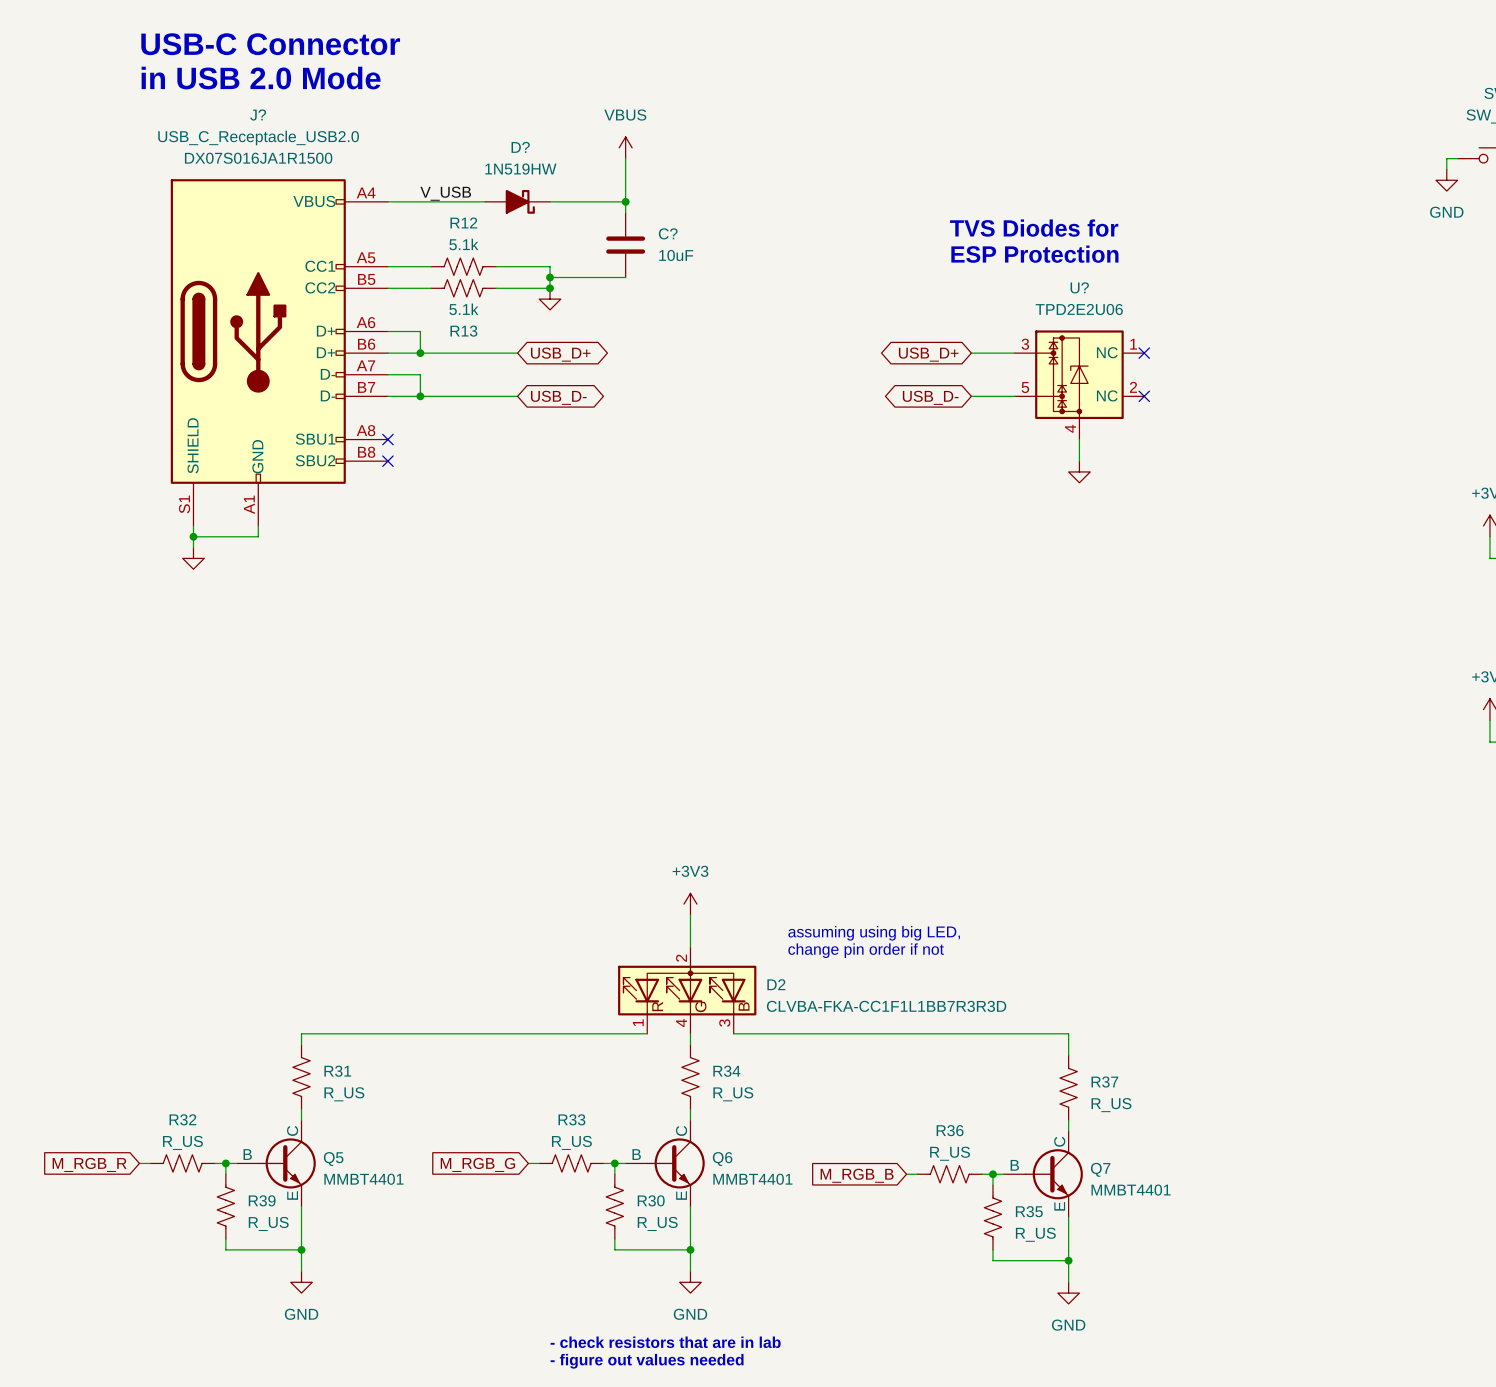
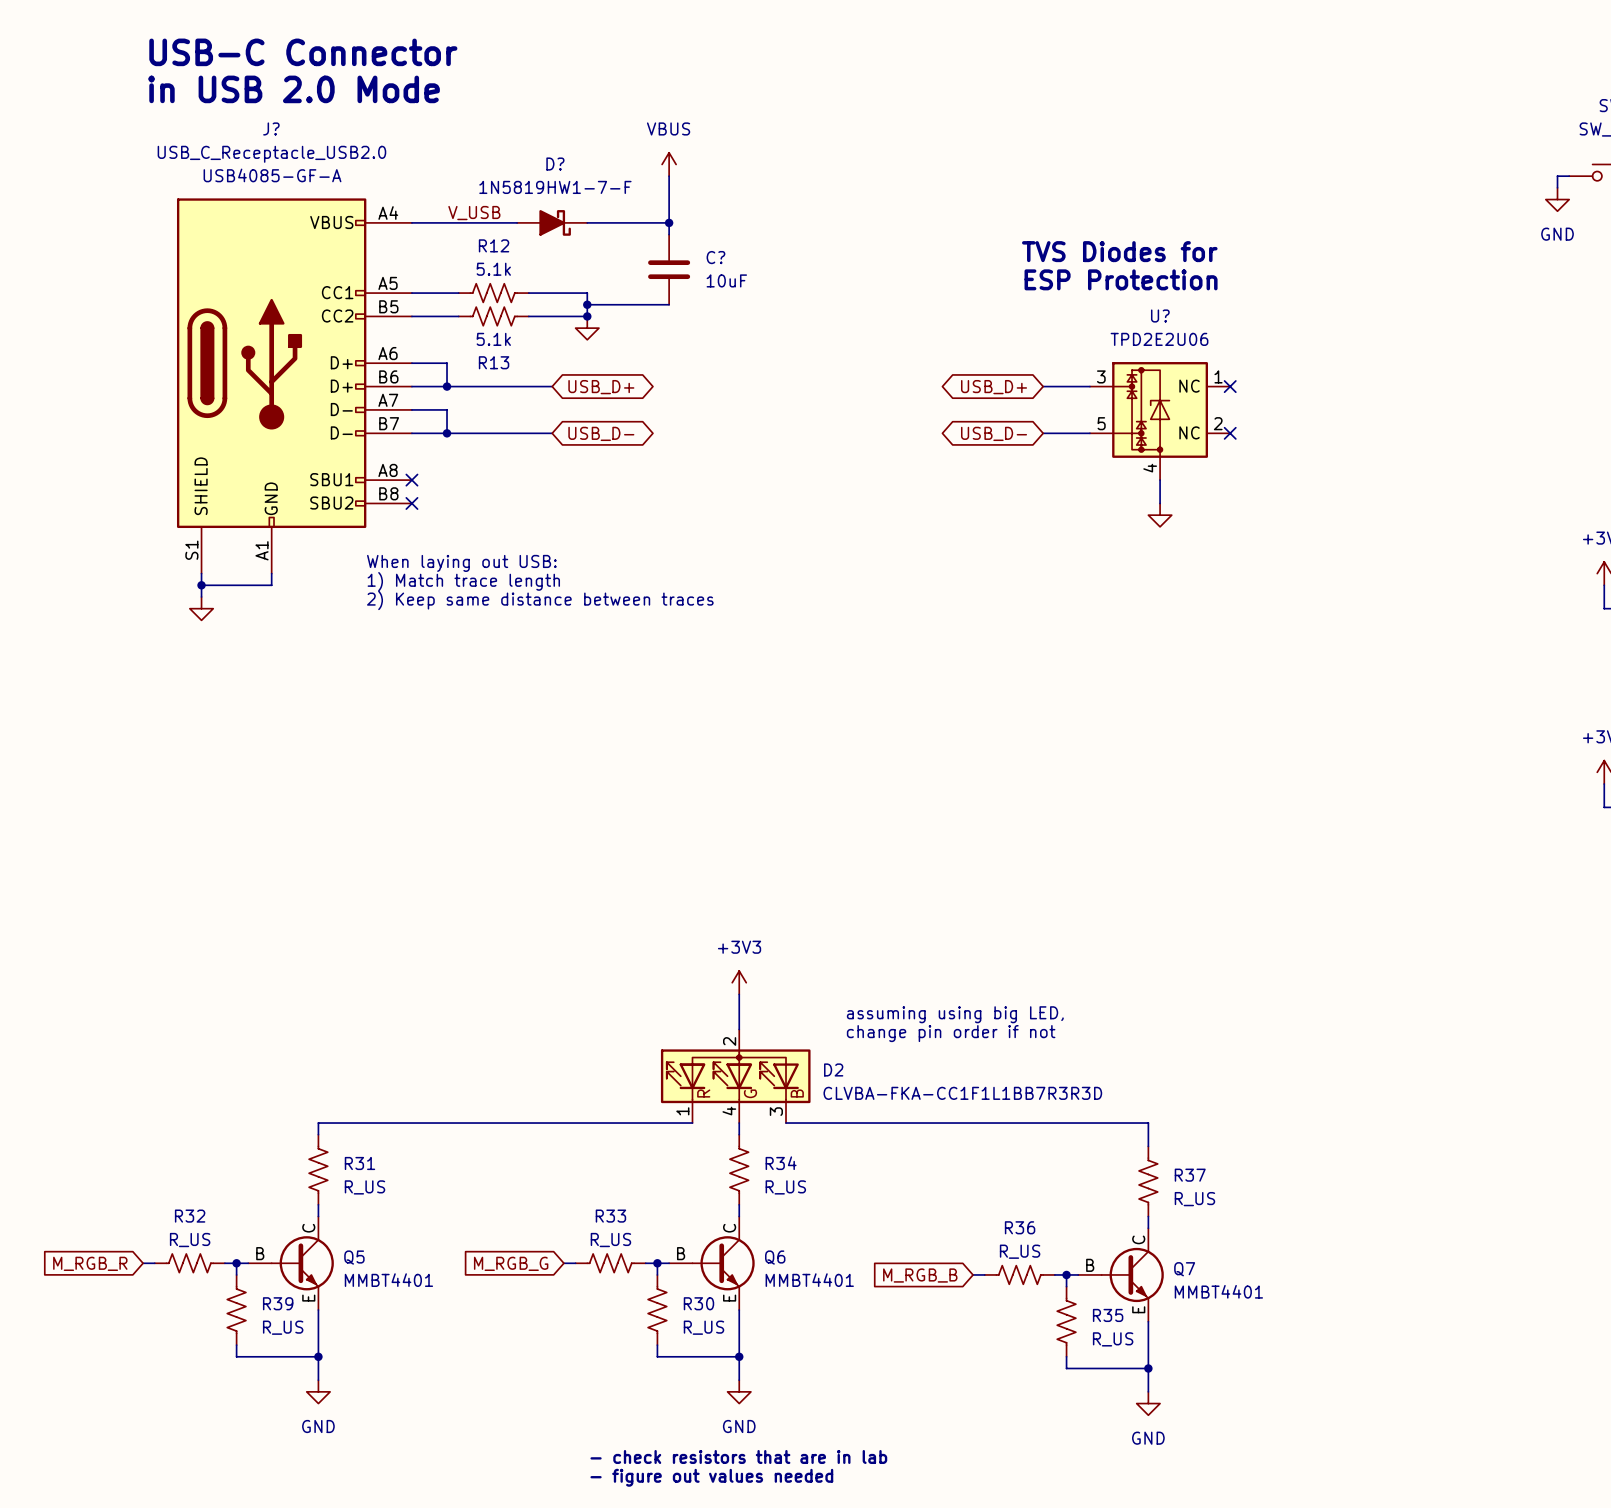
J? text: DX07S016JA1R1500 (258, 158) -> USB4085-GF-A (272, 175)
D? value: 1N519HW (520, 169) -> 1N5819HW1-7-F (555, 187)
text: none -> When laying out USB: (461, 563)
text: none -> 1) Match trace length (463, 581)
text: none -> 2) Keep same distance between traces (540, 600)

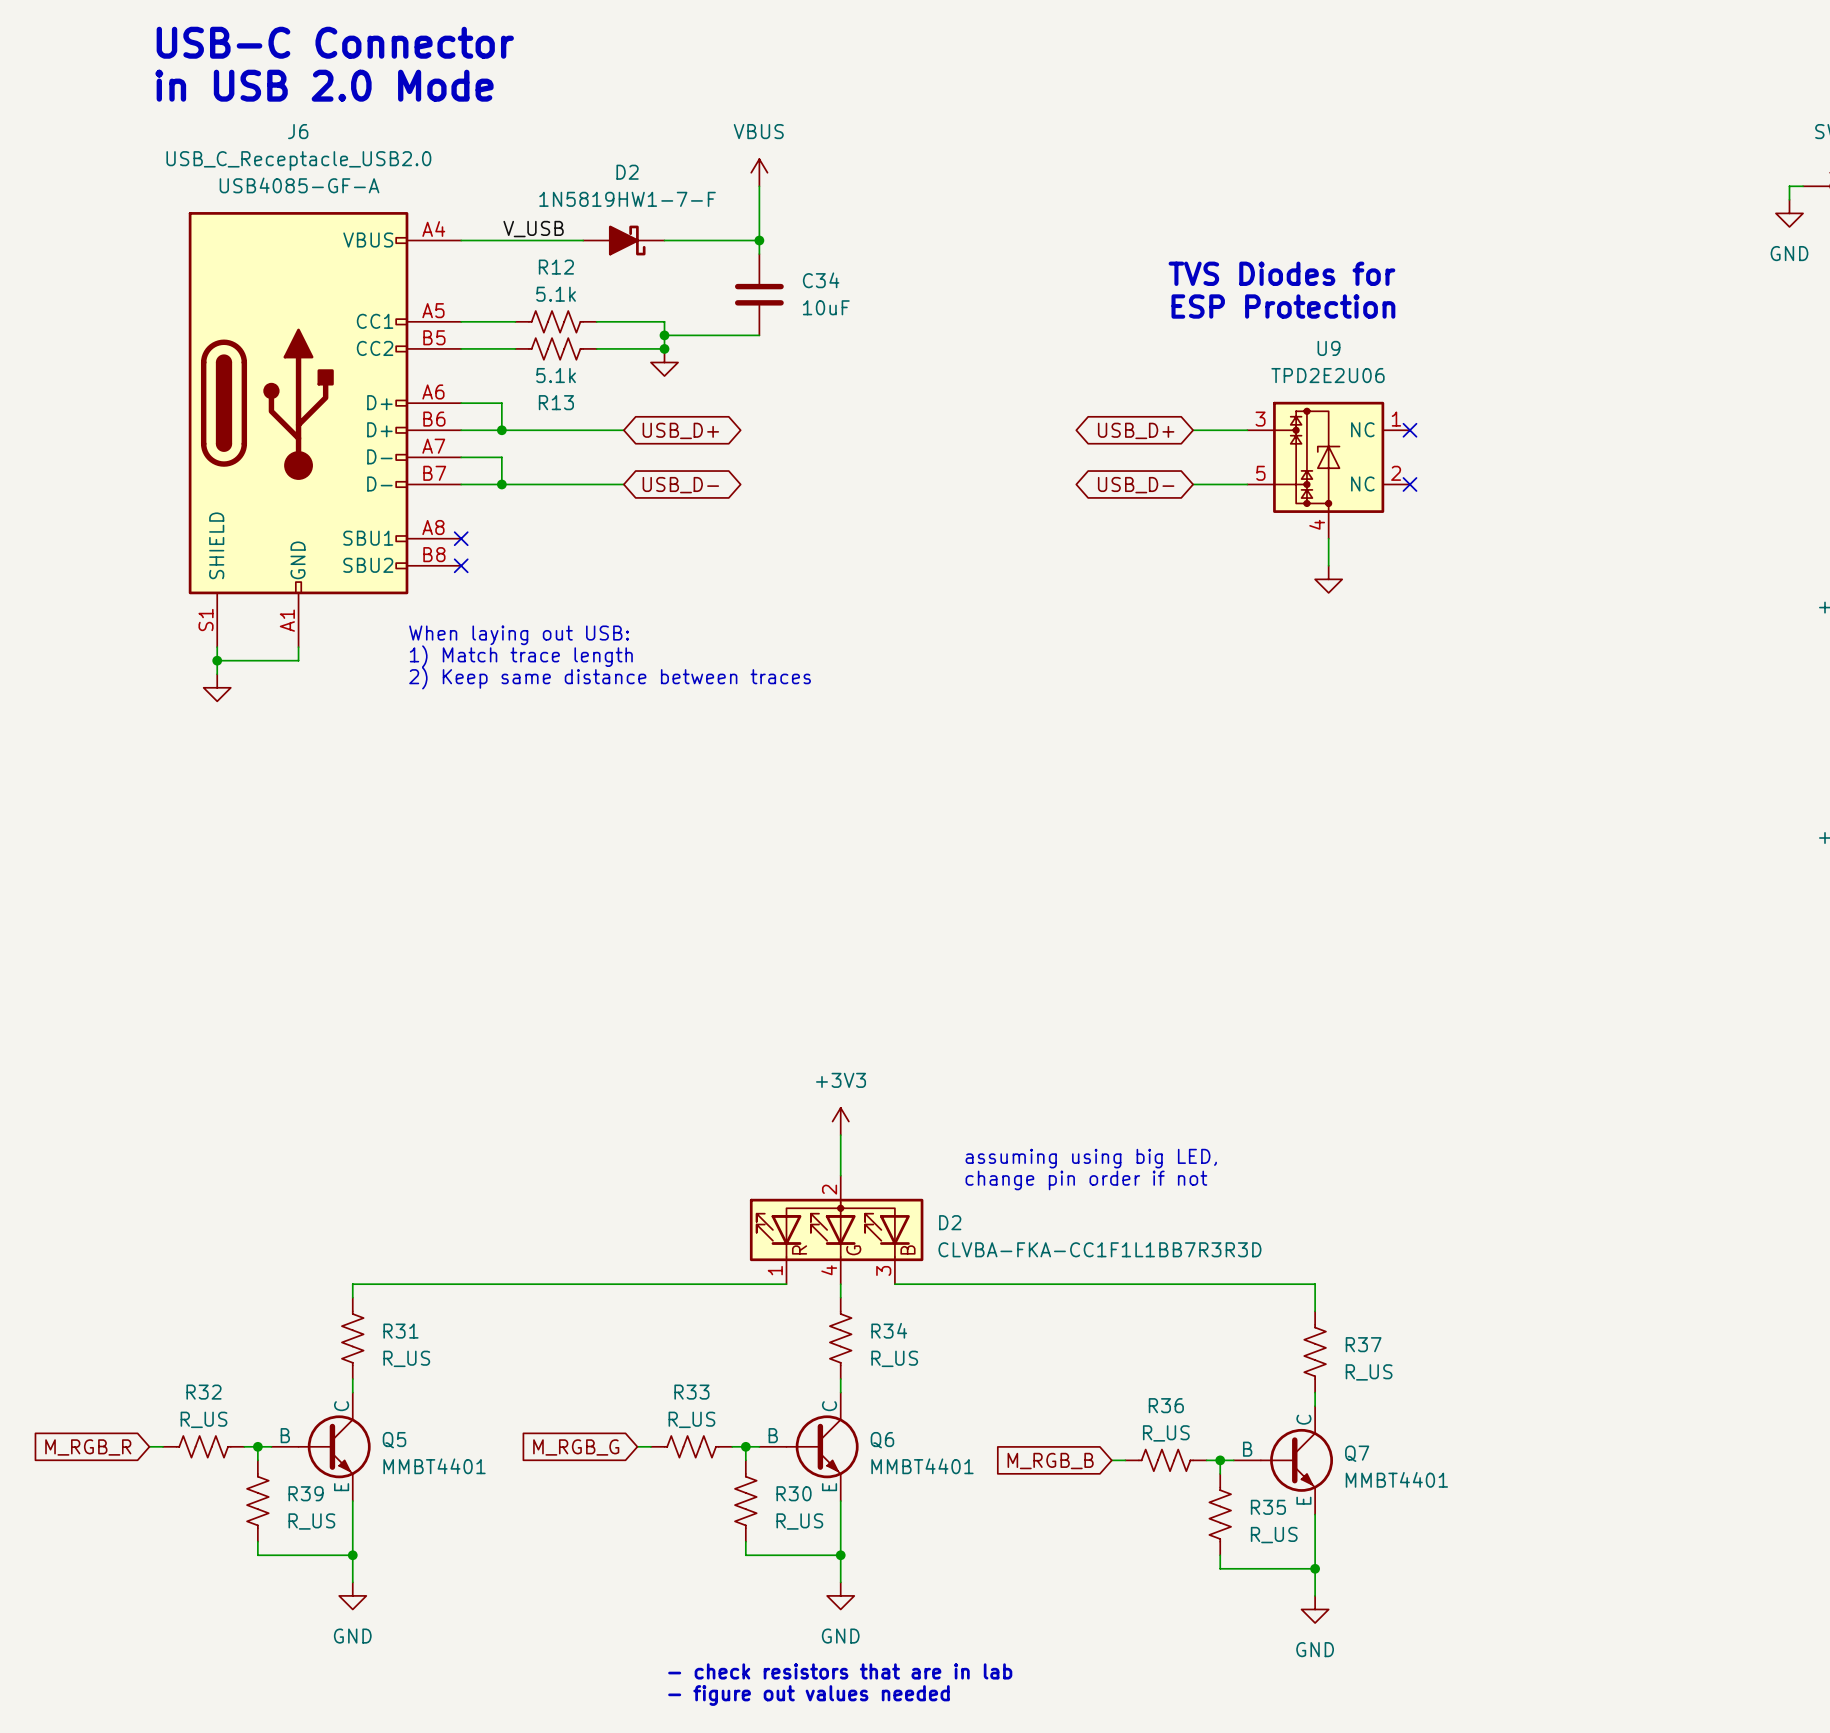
J? name: J? (271, 128) -> J6 (298, 131)
D? name: D? (555, 164) -> D2 (627, 172)
C? name: C? (715, 257) -> C34 (821, 280)
U? name: U? (1160, 316) -> U9 (1328, 348)

